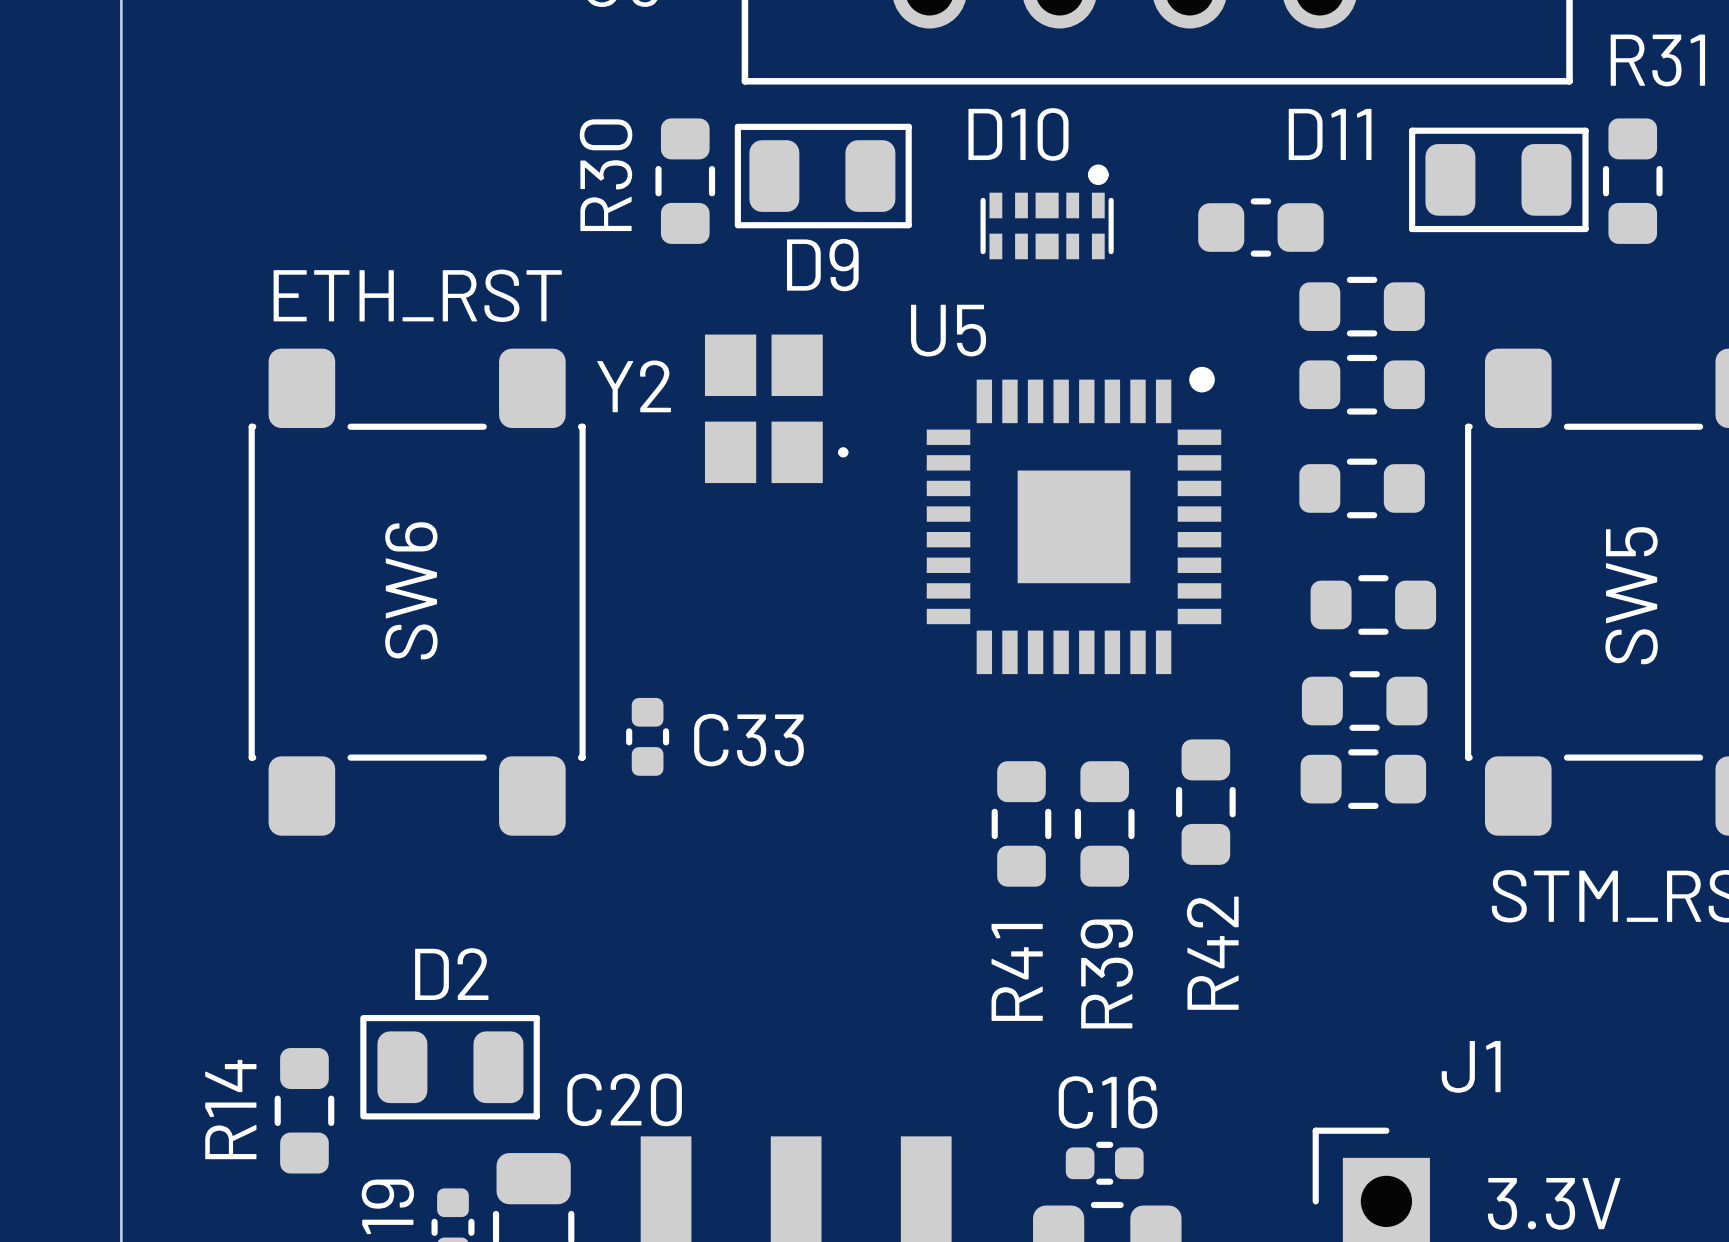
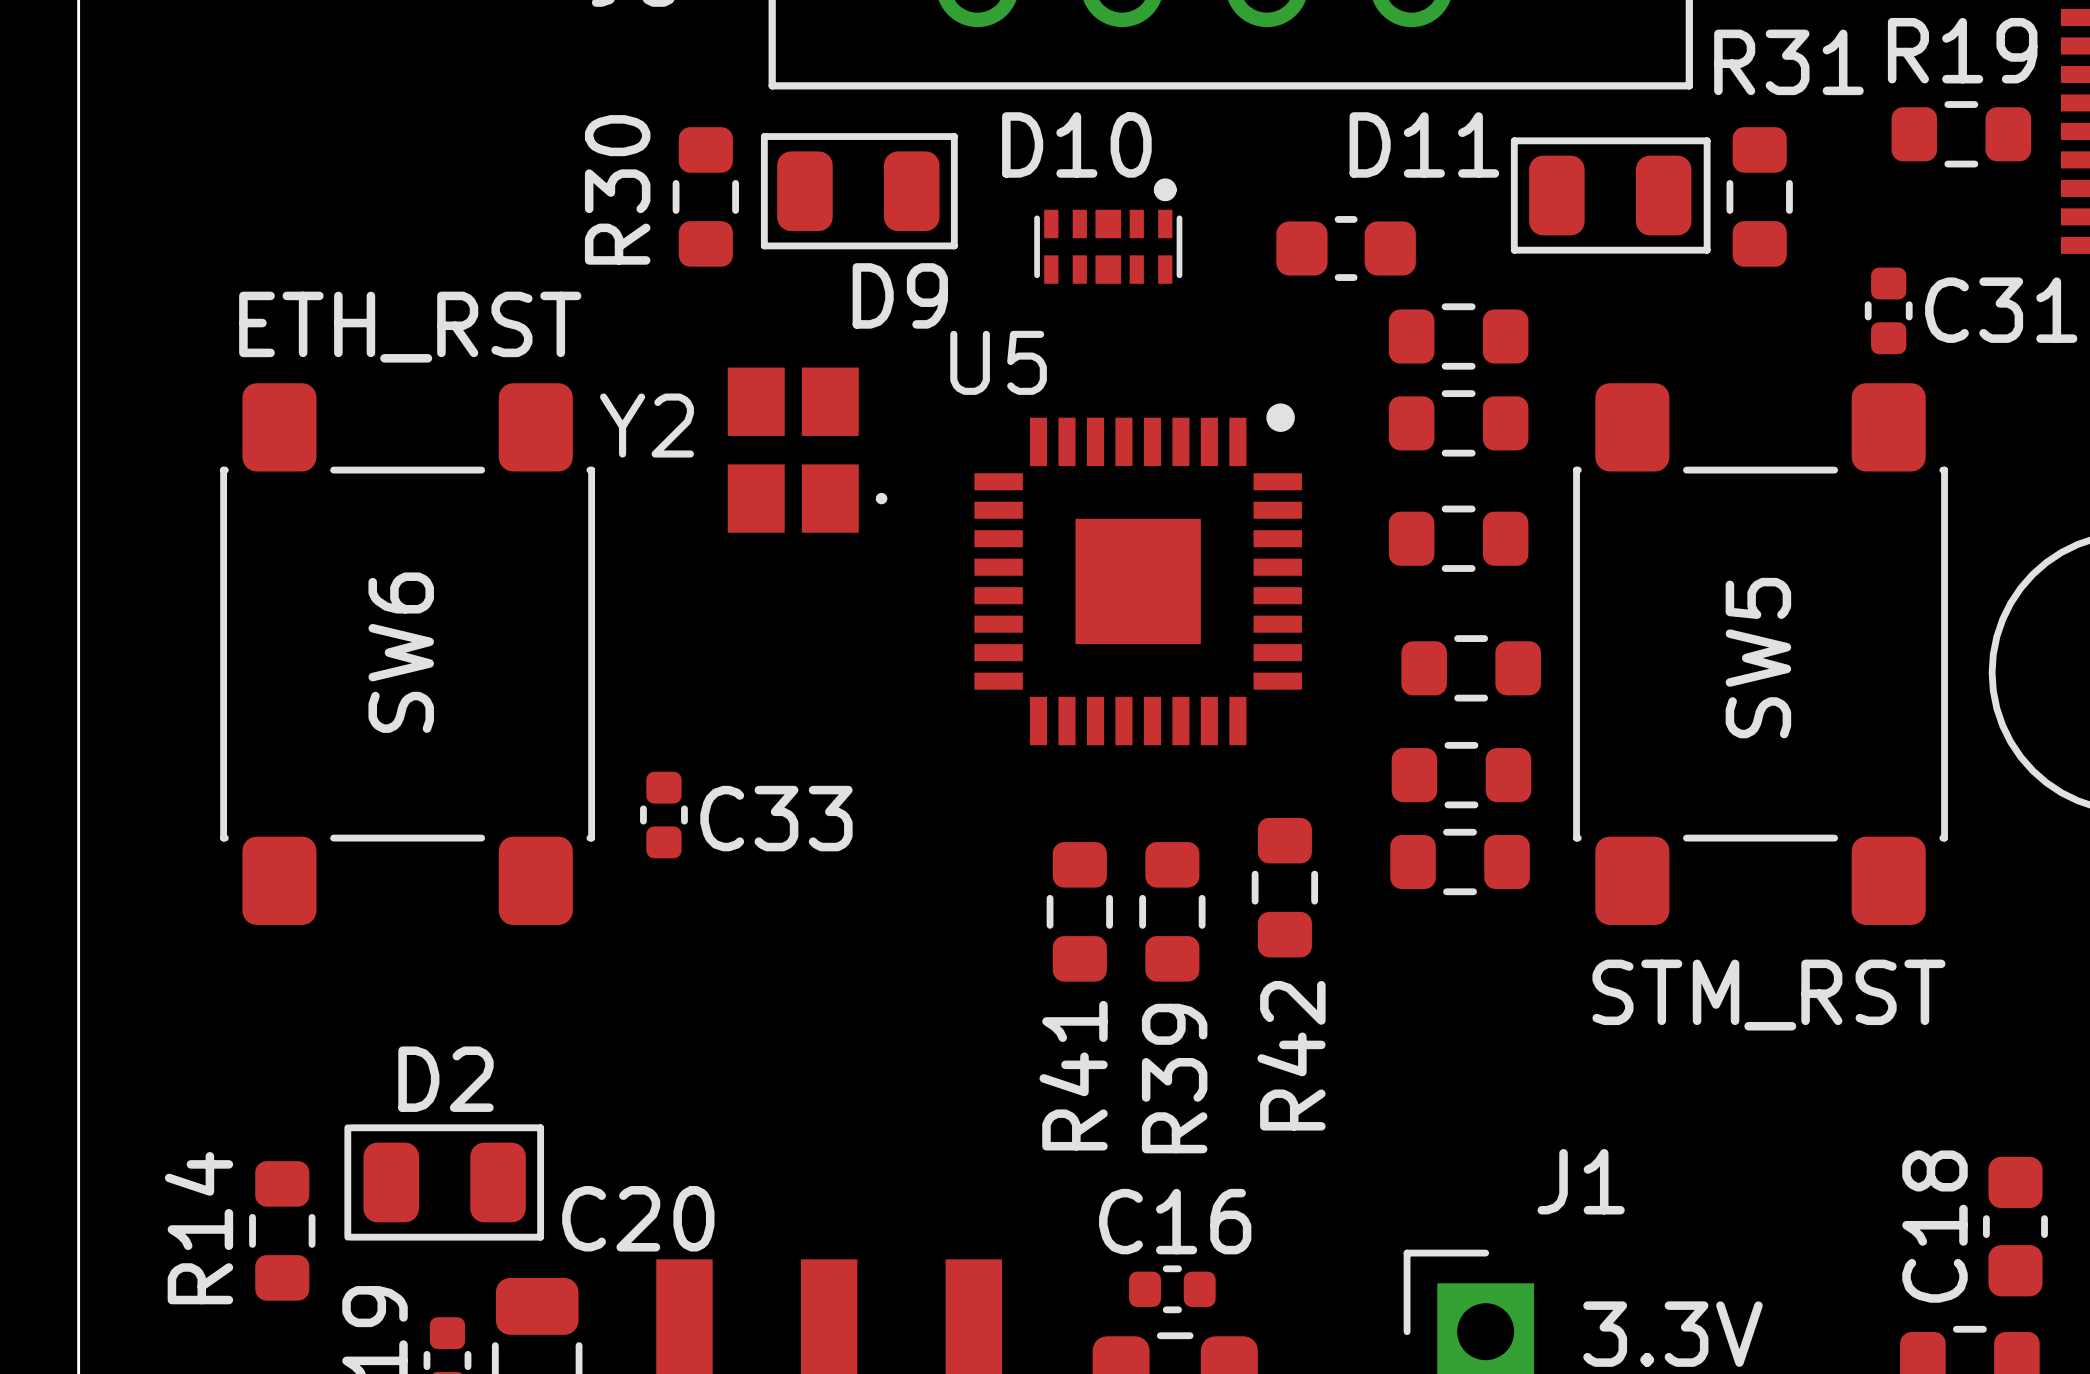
D9 name position: D9 (822, 265) -> D9 (900, 295)

